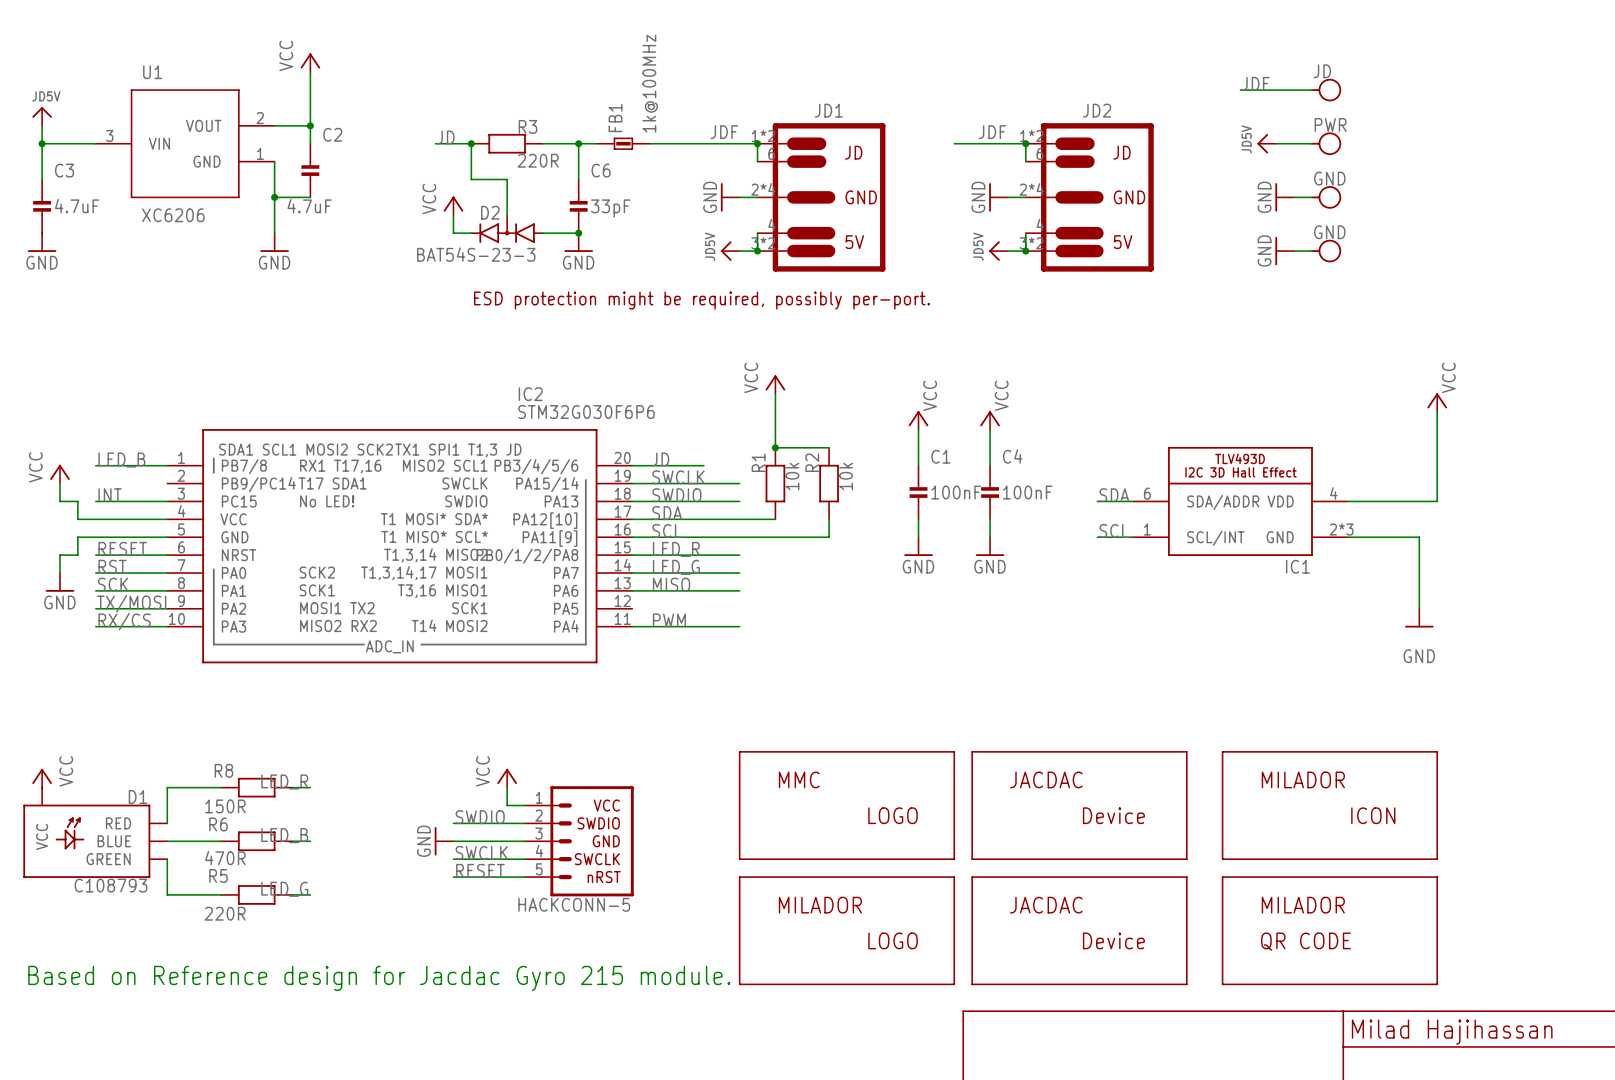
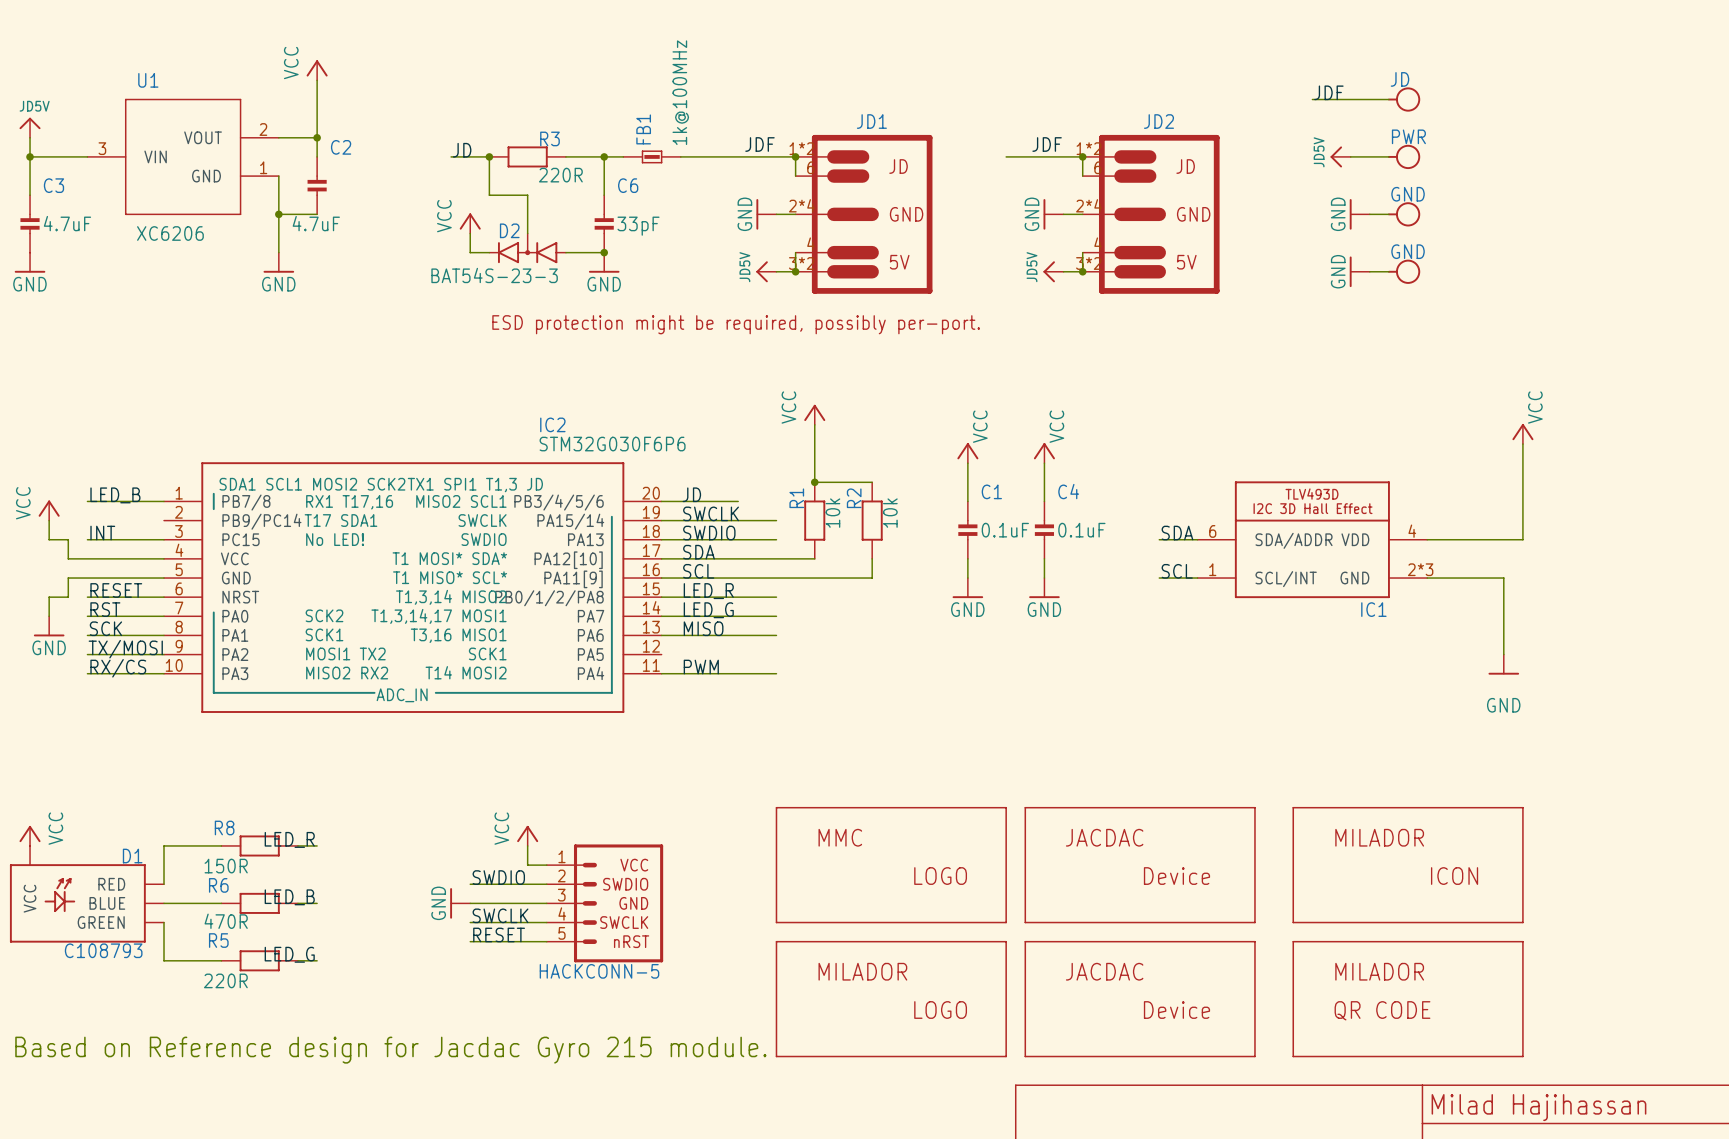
C1 value: 100nF (956, 492) -> 0.1uF (1005, 530)
C4 value: 100nF (1027, 492) -> 0.1uF (1081, 530)

